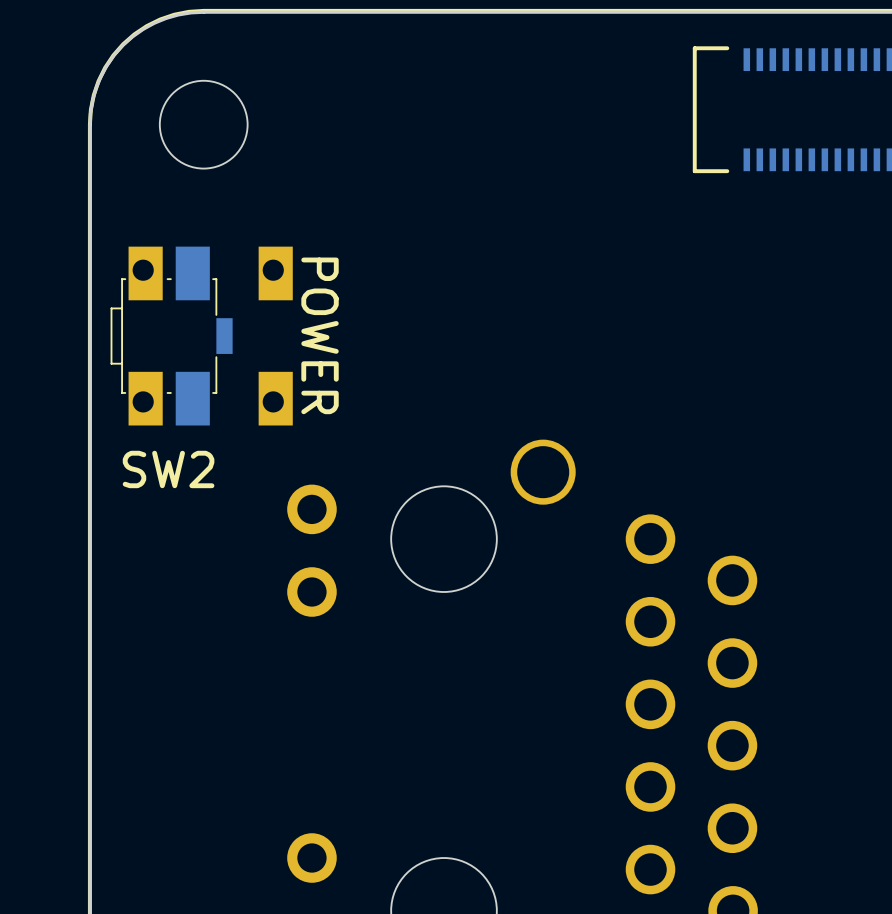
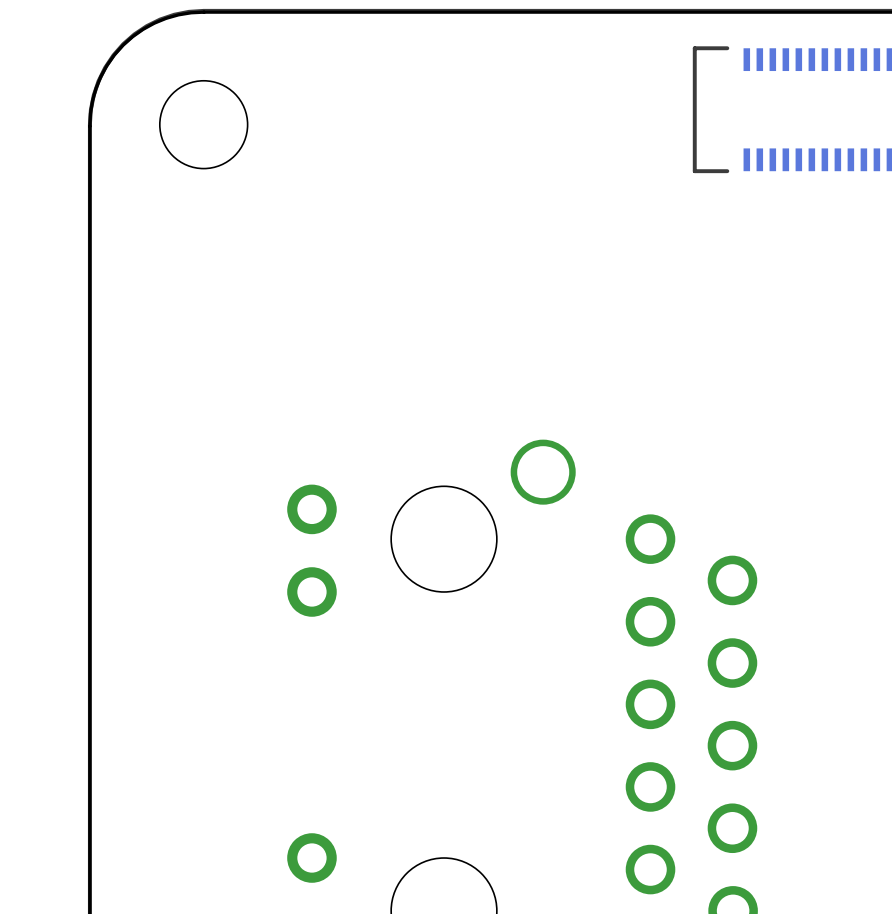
text: POWER (320, 335) -> none
SW2: (171, 336) -> none
part: (275, 336) -> none

